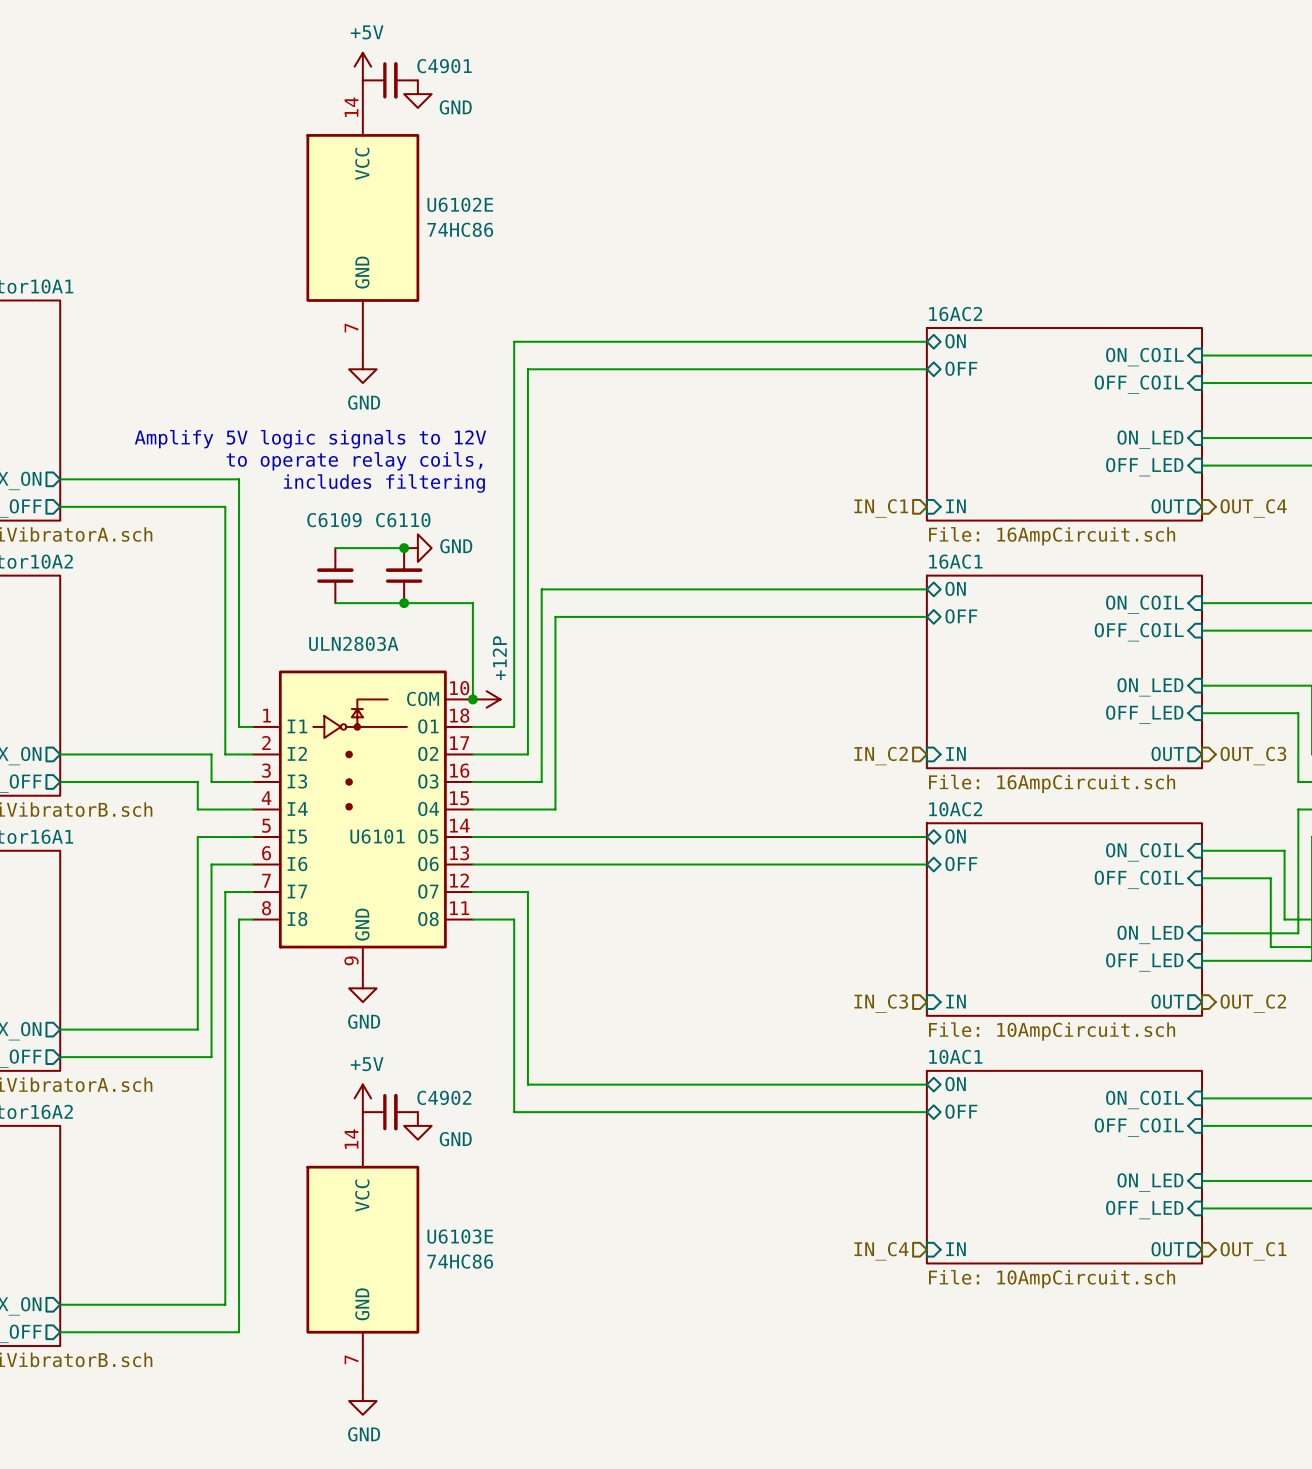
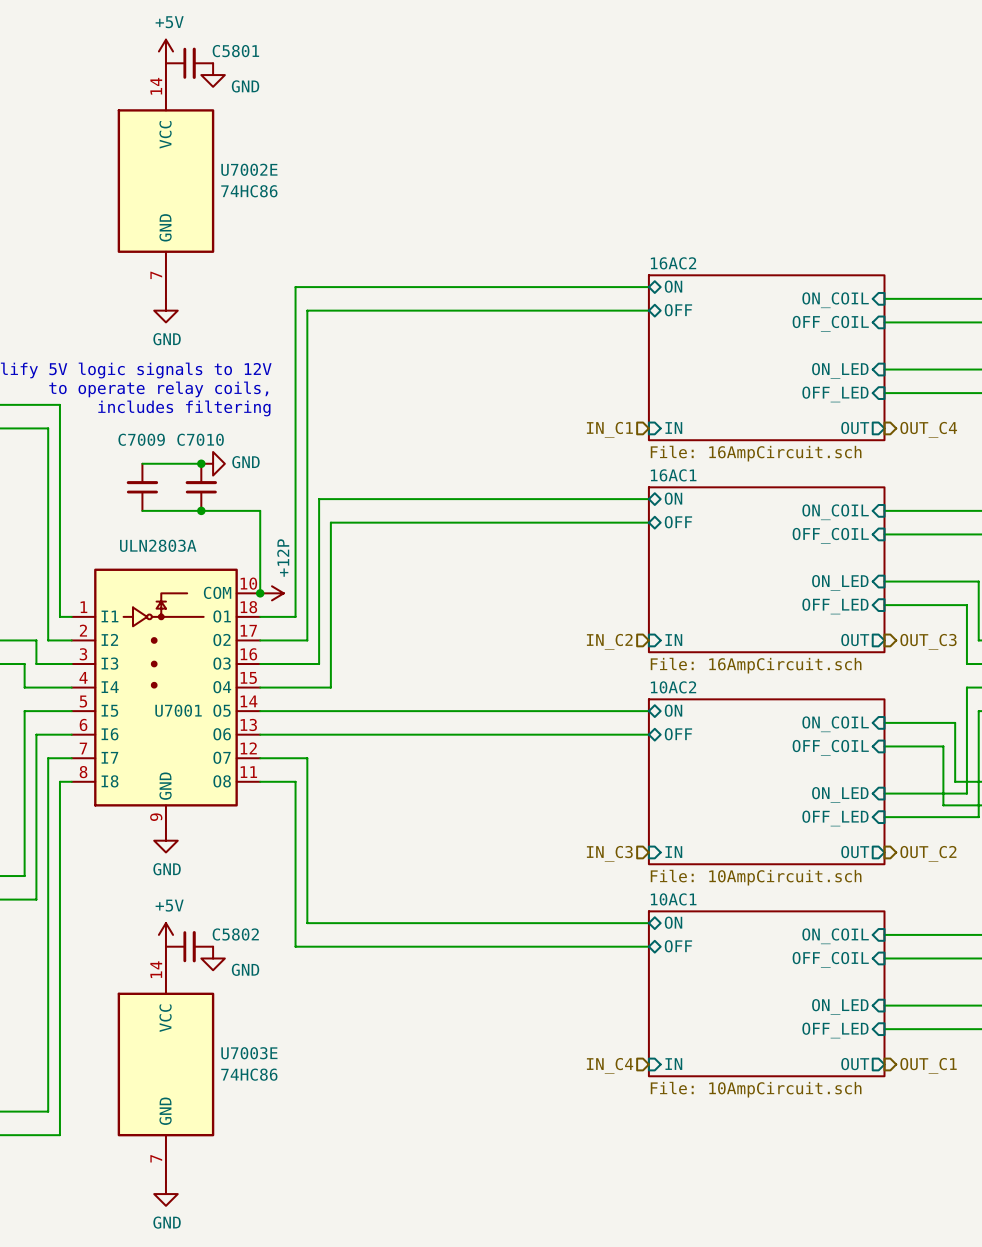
C4901 name: C4901 (444, 66) -> C5801 (235, 51)
U6102E name: U6102E (460, 204) -> U7002E (249, 169)
C6109 name: C6109 (334, 520) -> C7009 (141, 439)
C6110 name: C6110 (403, 520) -> C7010 (200, 439)
U6101 name: U6101 (377, 836) -> U7001 (178, 710)
C4902 name: C4902 (444, 1097) -> C5802 (235, 934)
U6103E name: U6103E (460, 1236) -> U7003E (249, 1053)

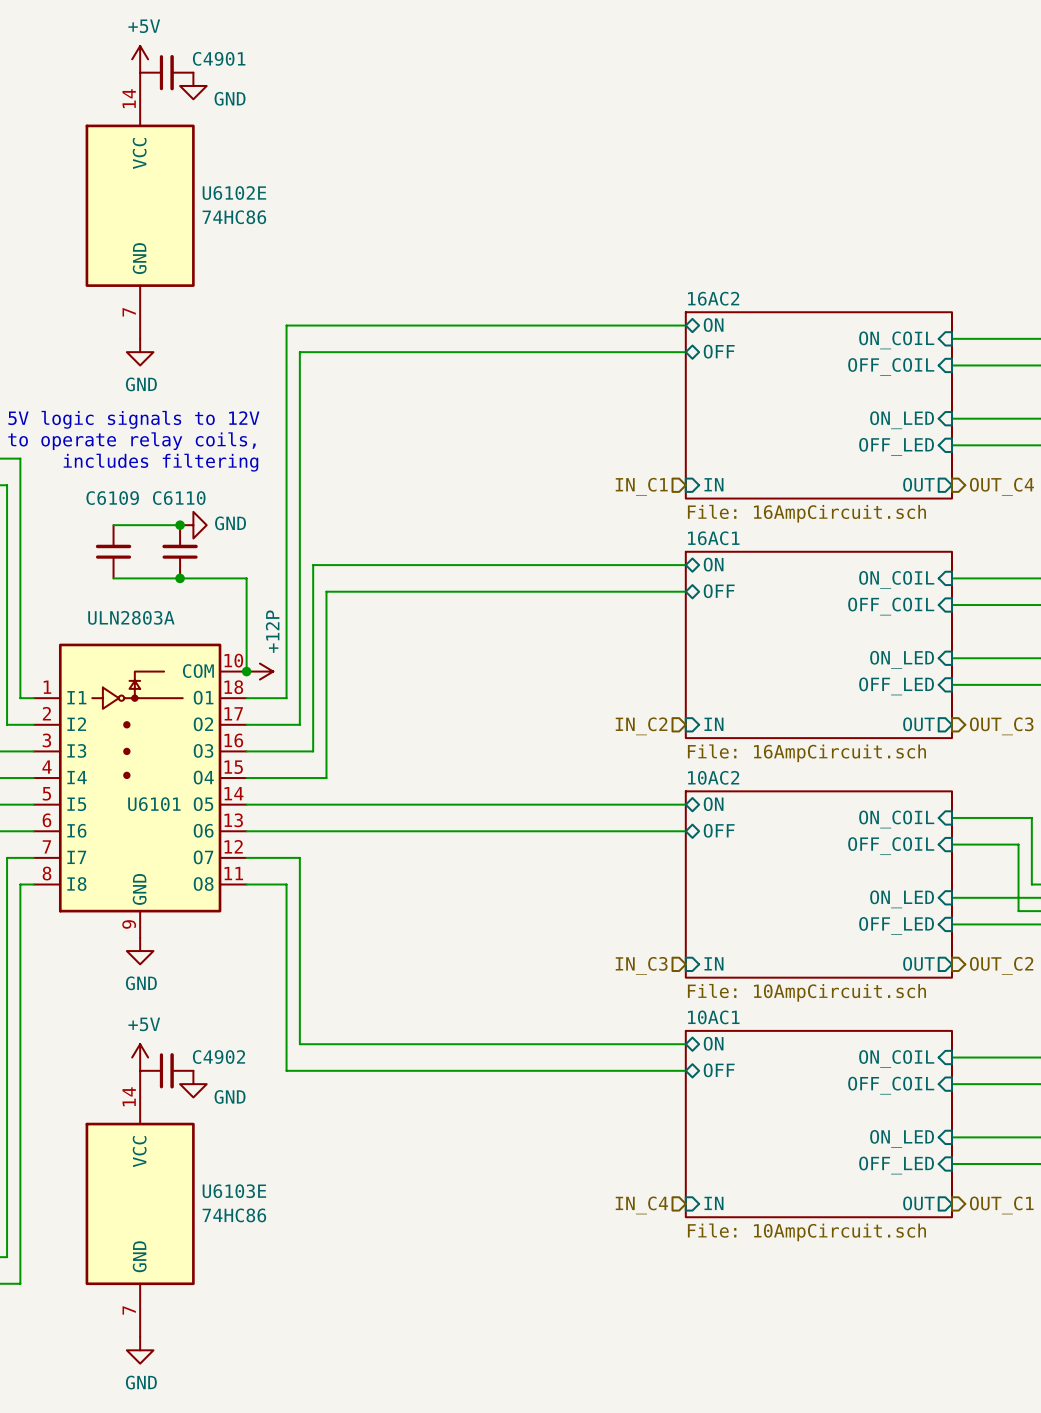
C5801 name: C5801 (235, 51) -> C4901 (219, 58)
U7002E name: U7002E (249, 169) -> U6102E (234, 193)
C7009 name: C7009 (141, 439) -> C6109 (112, 498)
C7010 name: C7010 (200, 439) -> C6110 (179, 498)
U7001 name: U7001 (178, 710) -> U6101 (154, 804)
C5802 name: C5802 (235, 934) -> C4902 (218, 1057)
U7003E name: U7003E (249, 1053) -> U6103E (234, 1191)

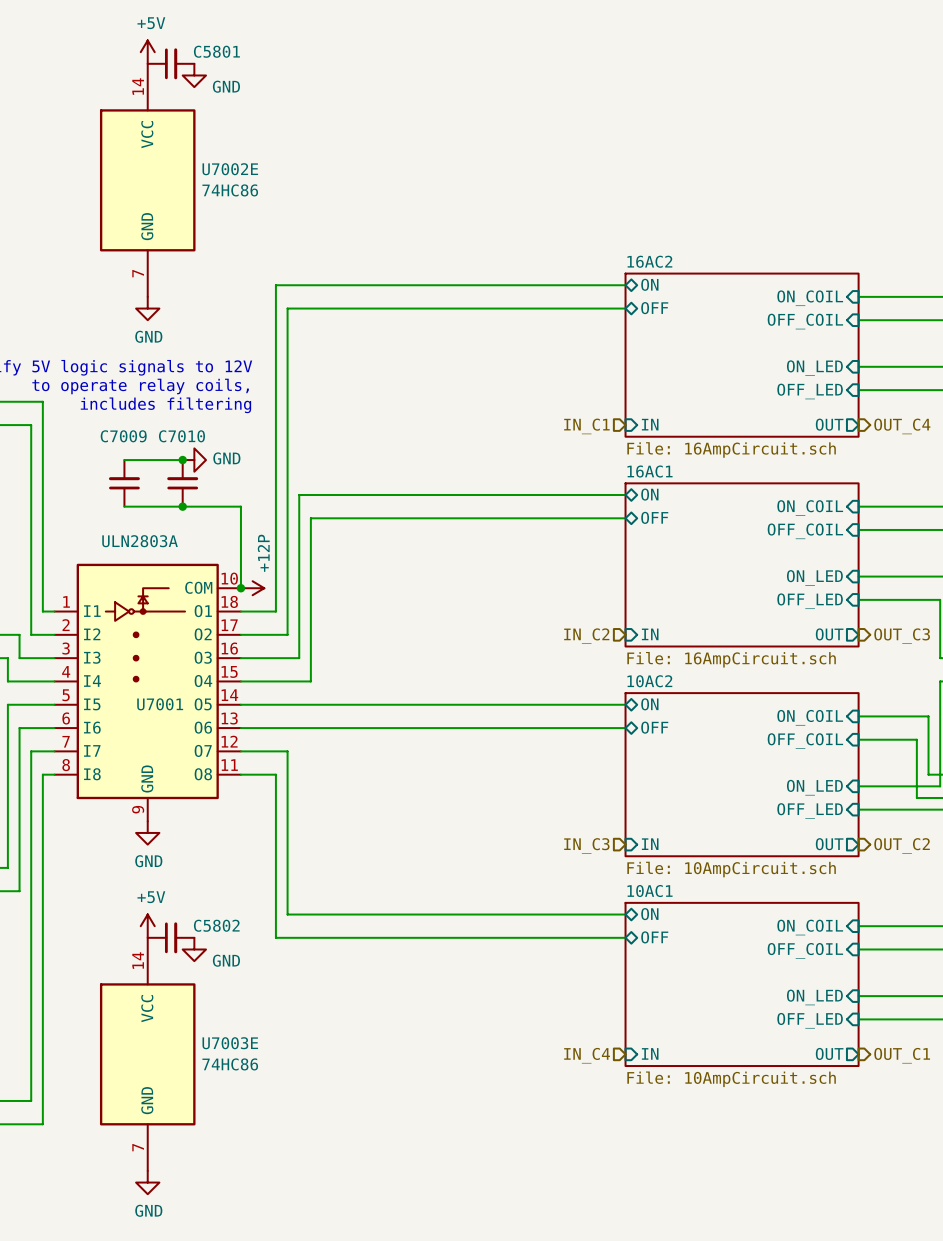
C4901 name: C4901 (219, 58) -> C5801 (216, 51)
U6102E name: U6102E (234, 193) -> U7002E (230, 169)
C6109 name: C6109 (112, 498) -> C7009 (123, 436)
C6110 name: C6110 (179, 498) -> C7010 (181, 436)
U6101 name: U6101 (154, 804) -> U7001 (160, 704)
C4902 name: C4902 (218, 1057) -> C5802 (216, 925)
U6103E name: U6103E (234, 1191) -> U7003E (230, 1043)

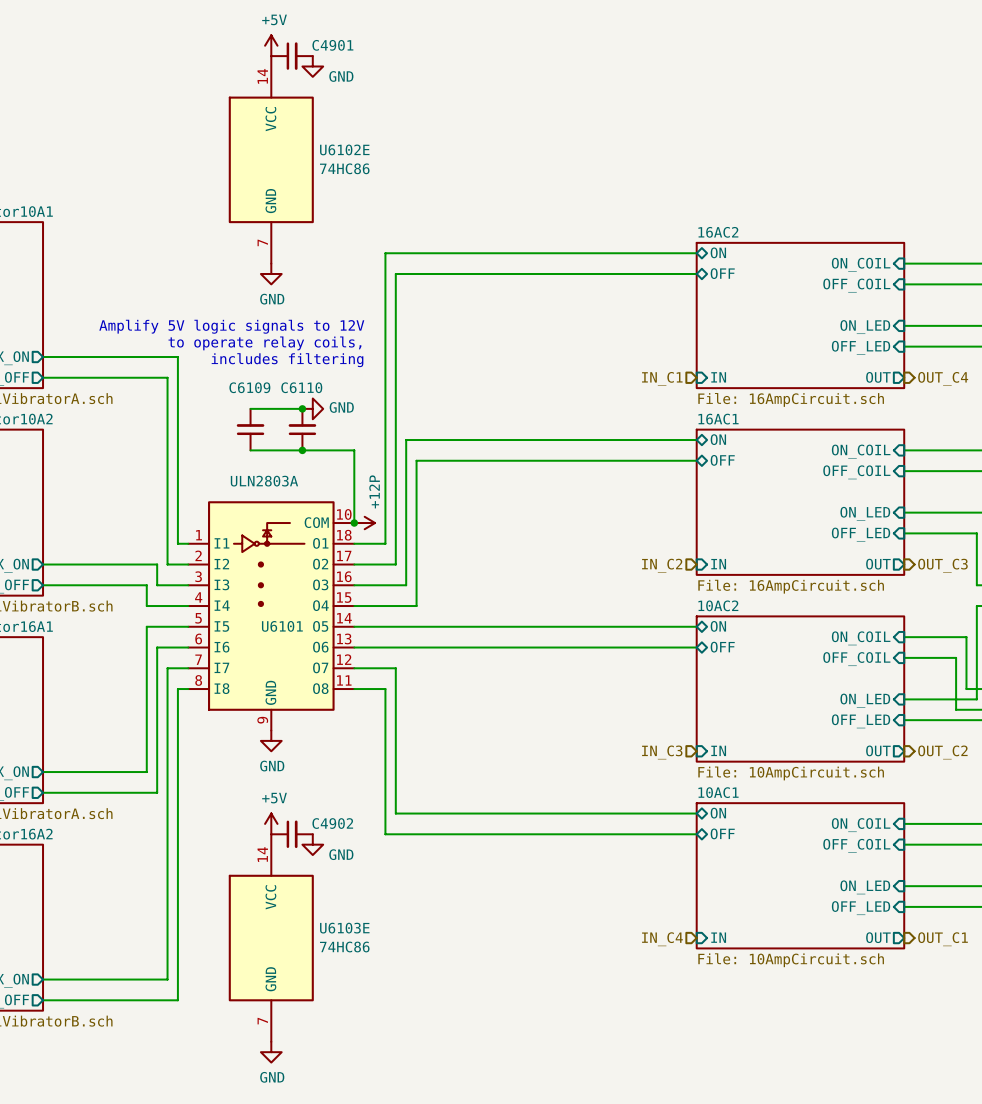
C5801 name: C5801 (216, 51) -> C4901 (332, 45)
U7002E name: U7002E (230, 169) -> U6102E (344, 149)
C7009 name: C7009 (123, 436) -> C6109 (249, 387)
C7010 name: C7010 (181, 436) -> C6110 (301, 387)
U7001 name: U7001 (160, 704) -> U6101 (282, 626)
C5802 name: C5802 (216, 925) -> C4902 (332, 823)
U7003E name: U7003E (230, 1043) -> U6103E (344, 928)

